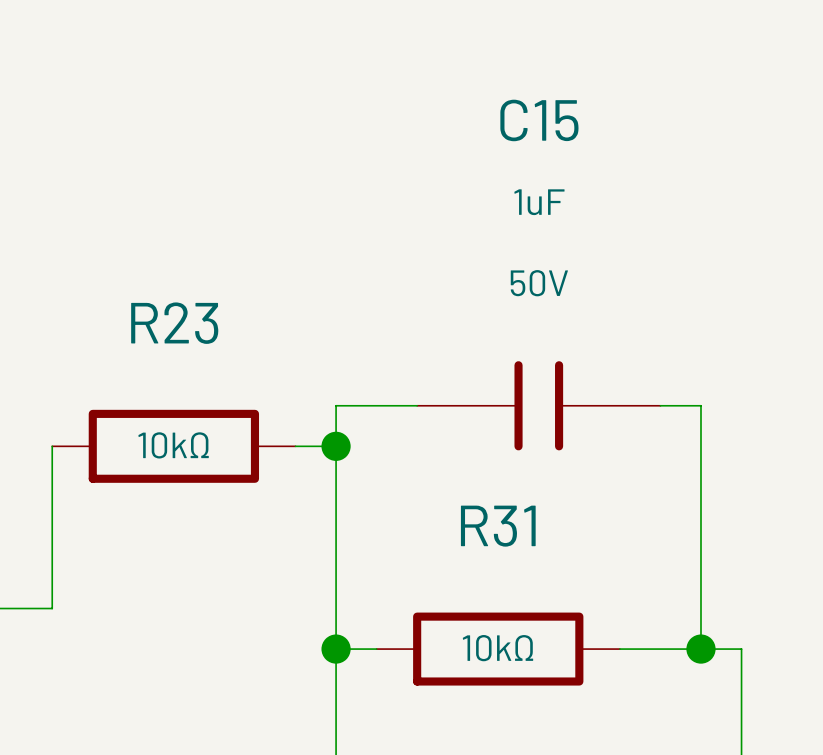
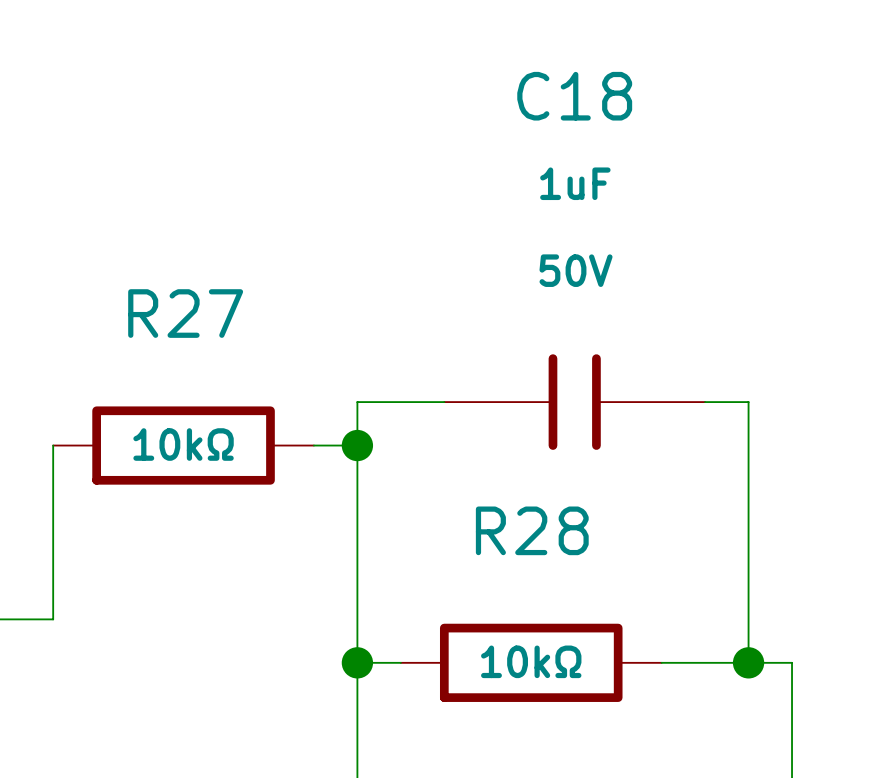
C15 name: C15 (539, 120) -> C18 (574, 96)
R23 name: R23 (174, 323) -> R27 (185, 313)
R31 name: R31 (498, 526) -> R28 (532, 530)

